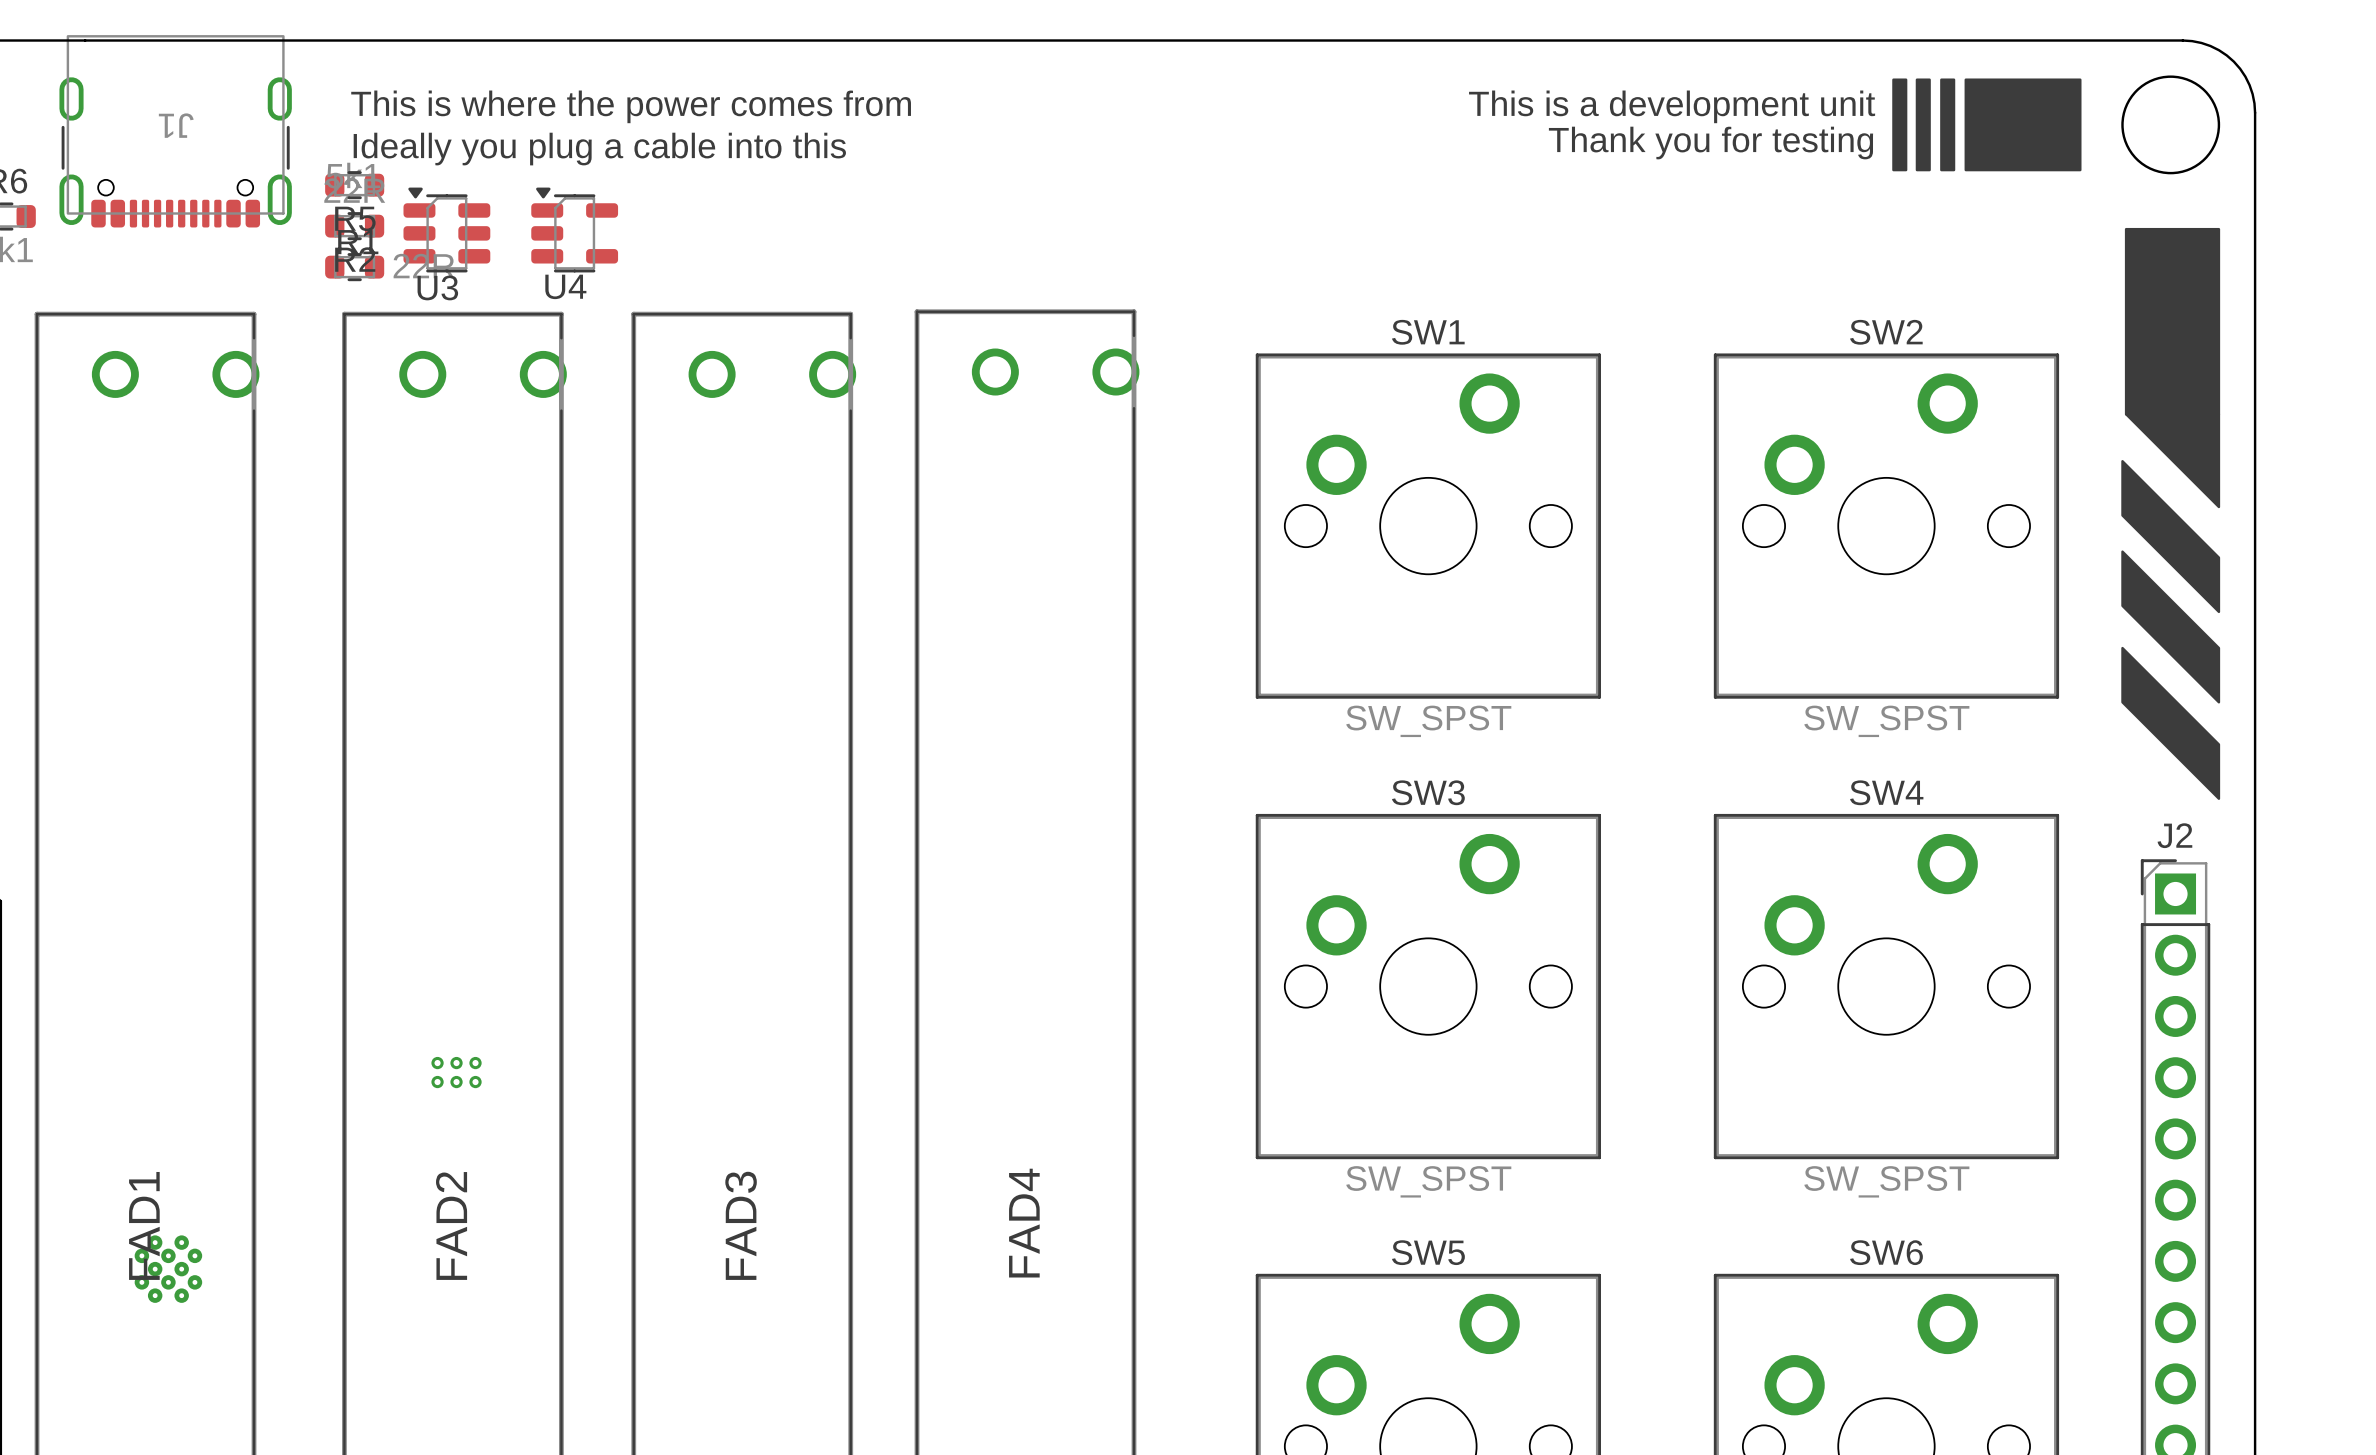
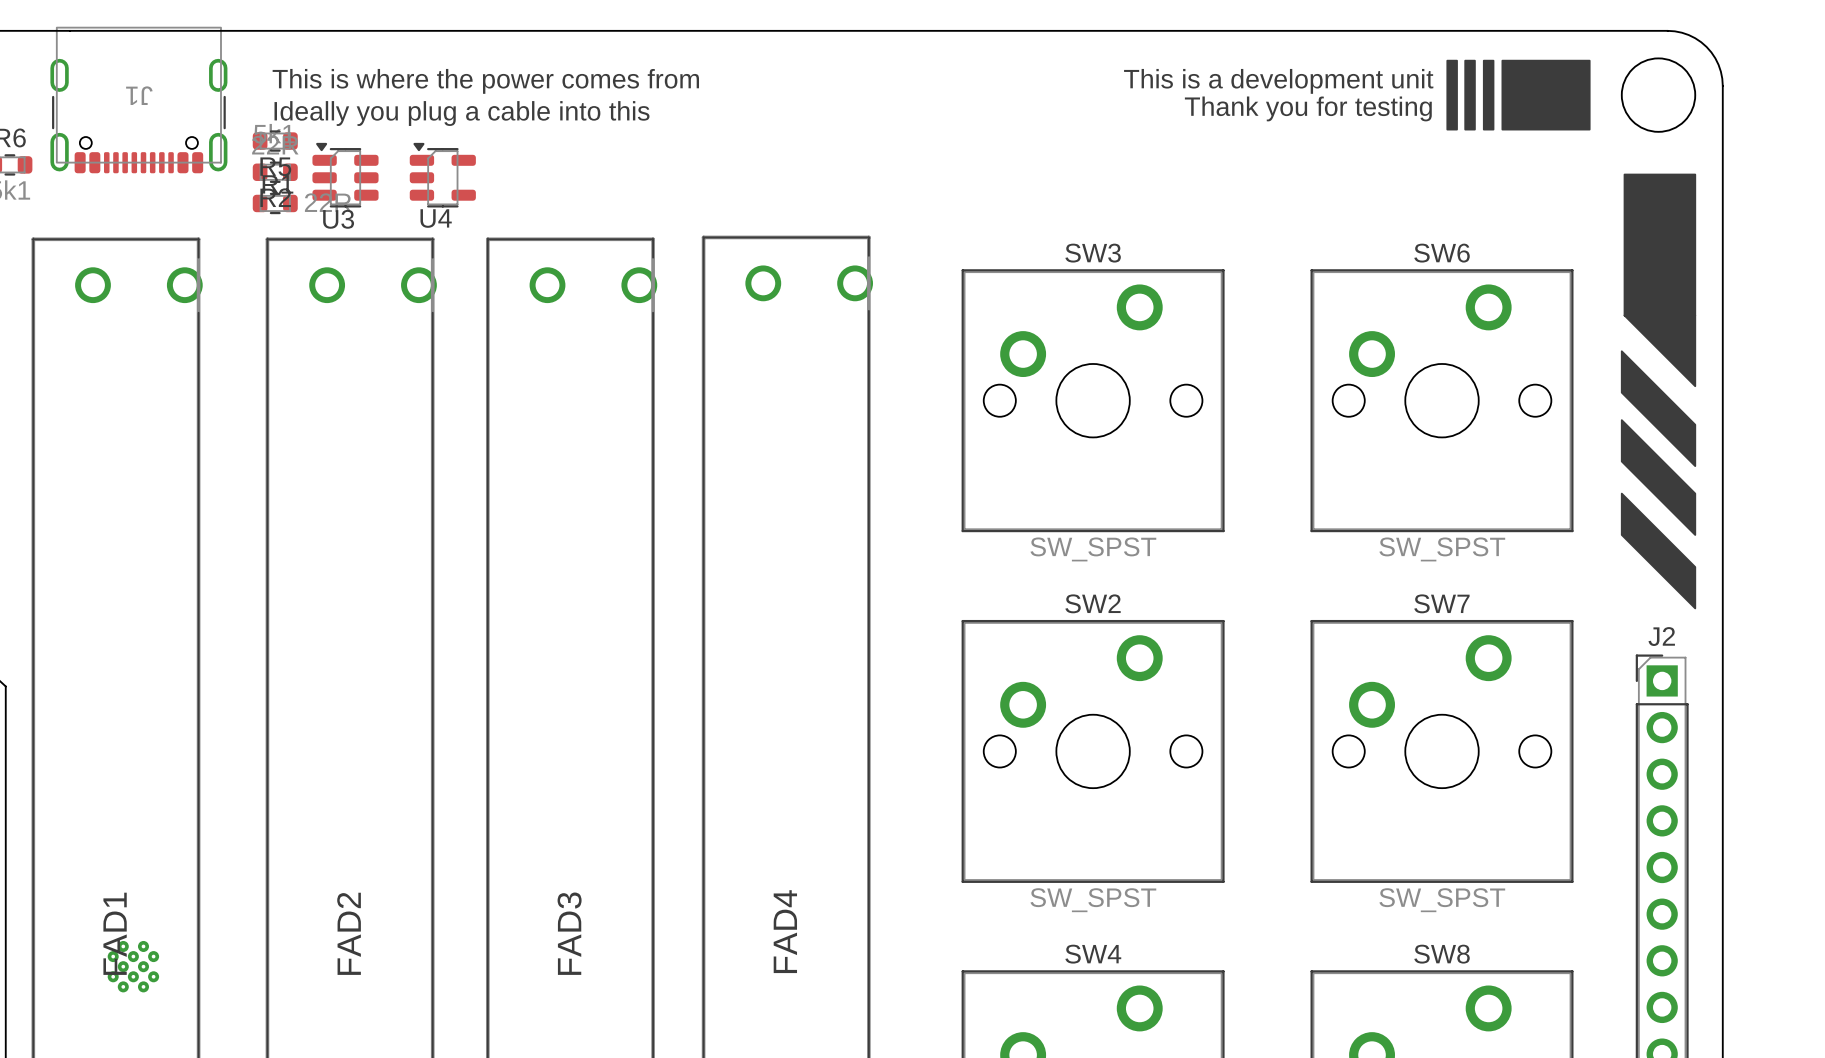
SW1 name: SW1 (1428, 332) -> SW3 (1093, 253)
SW2 name: SW2 (1886, 332) -> SW6 (1442, 253)
SW3 name: SW3 (1428, 792) -> SW2 (1093, 603)
SW4 name: SW4 (1886, 792) -> SW7 (1441, 603)
part: (456, 1072) -> none
SW5 name: SW5 (1428, 1252) -> SW4 (1093, 954)
SW6 name: SW6 (1886, 1252) -> SW8 (1442, 954)

